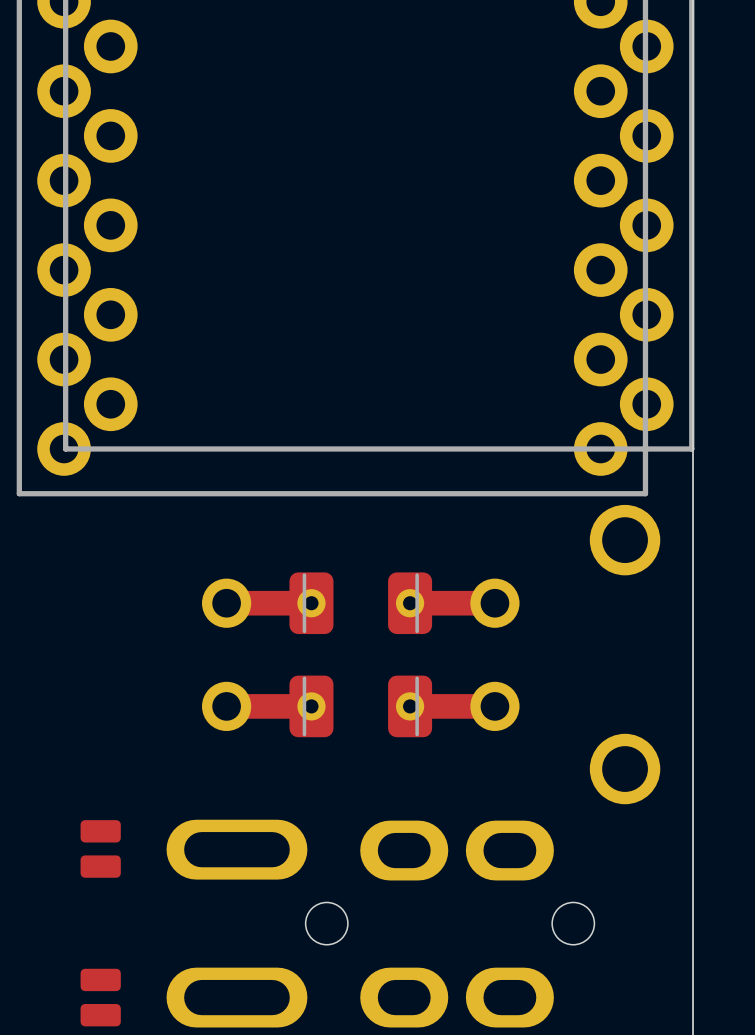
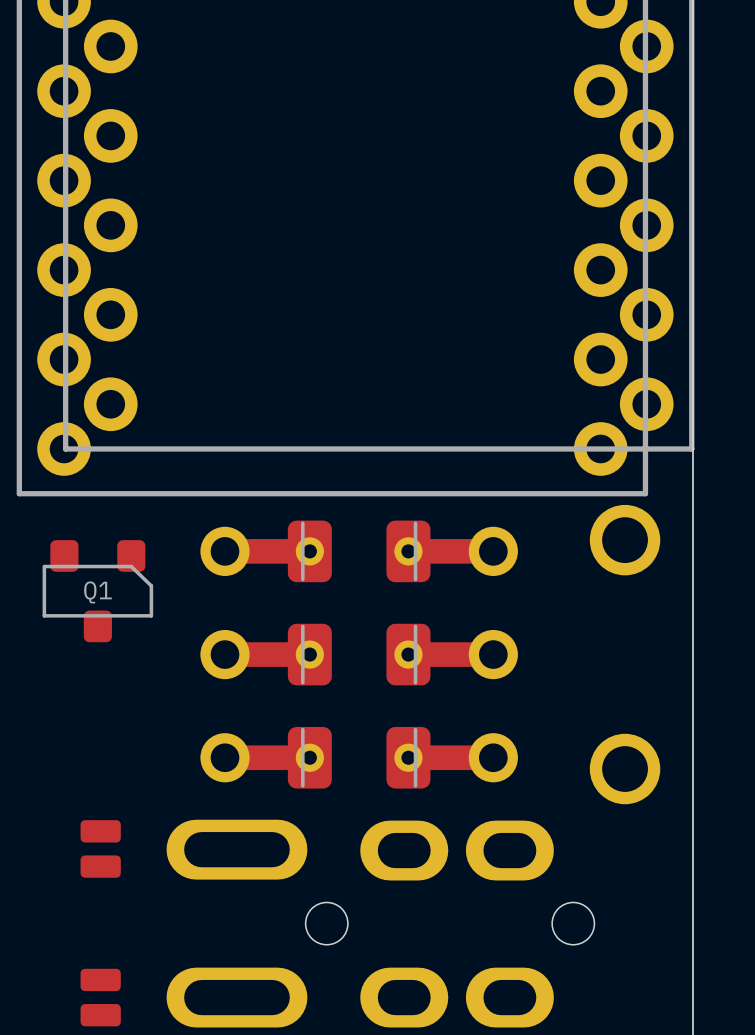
part: none -> (359, 551)
Q1: none -> (97, 591)
part: (360, 603) -> none
part: none -> (359, 654)
part: (360, 706) -> none
part: none -> (359, 757)

